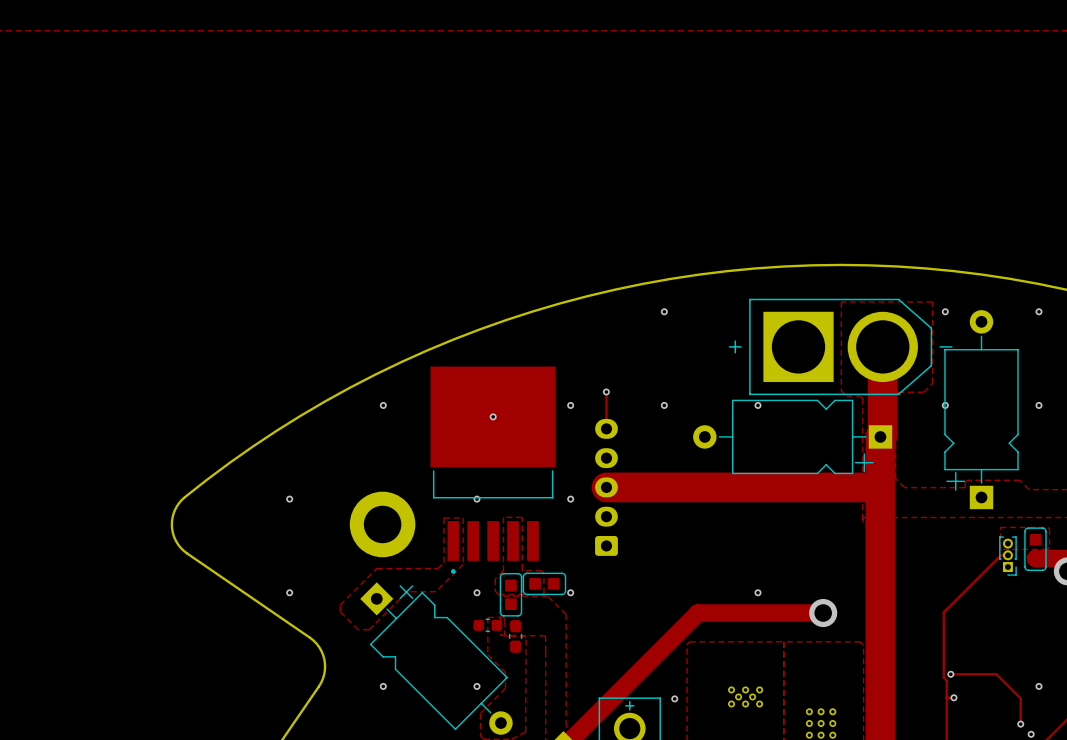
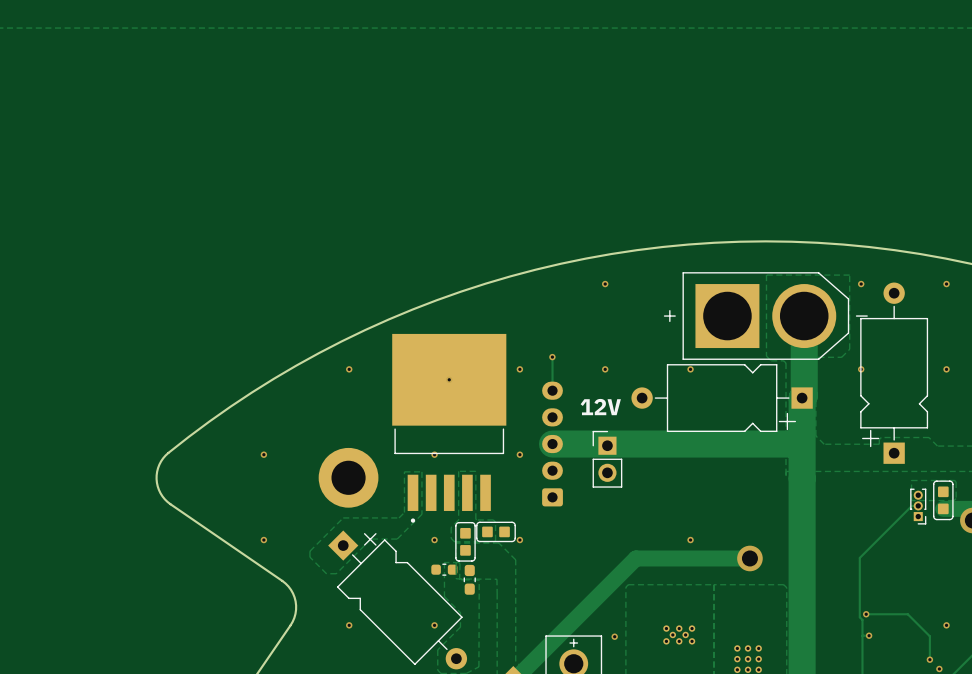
text: none -> 12V (600, 407)
part: none -> (607, 459)

